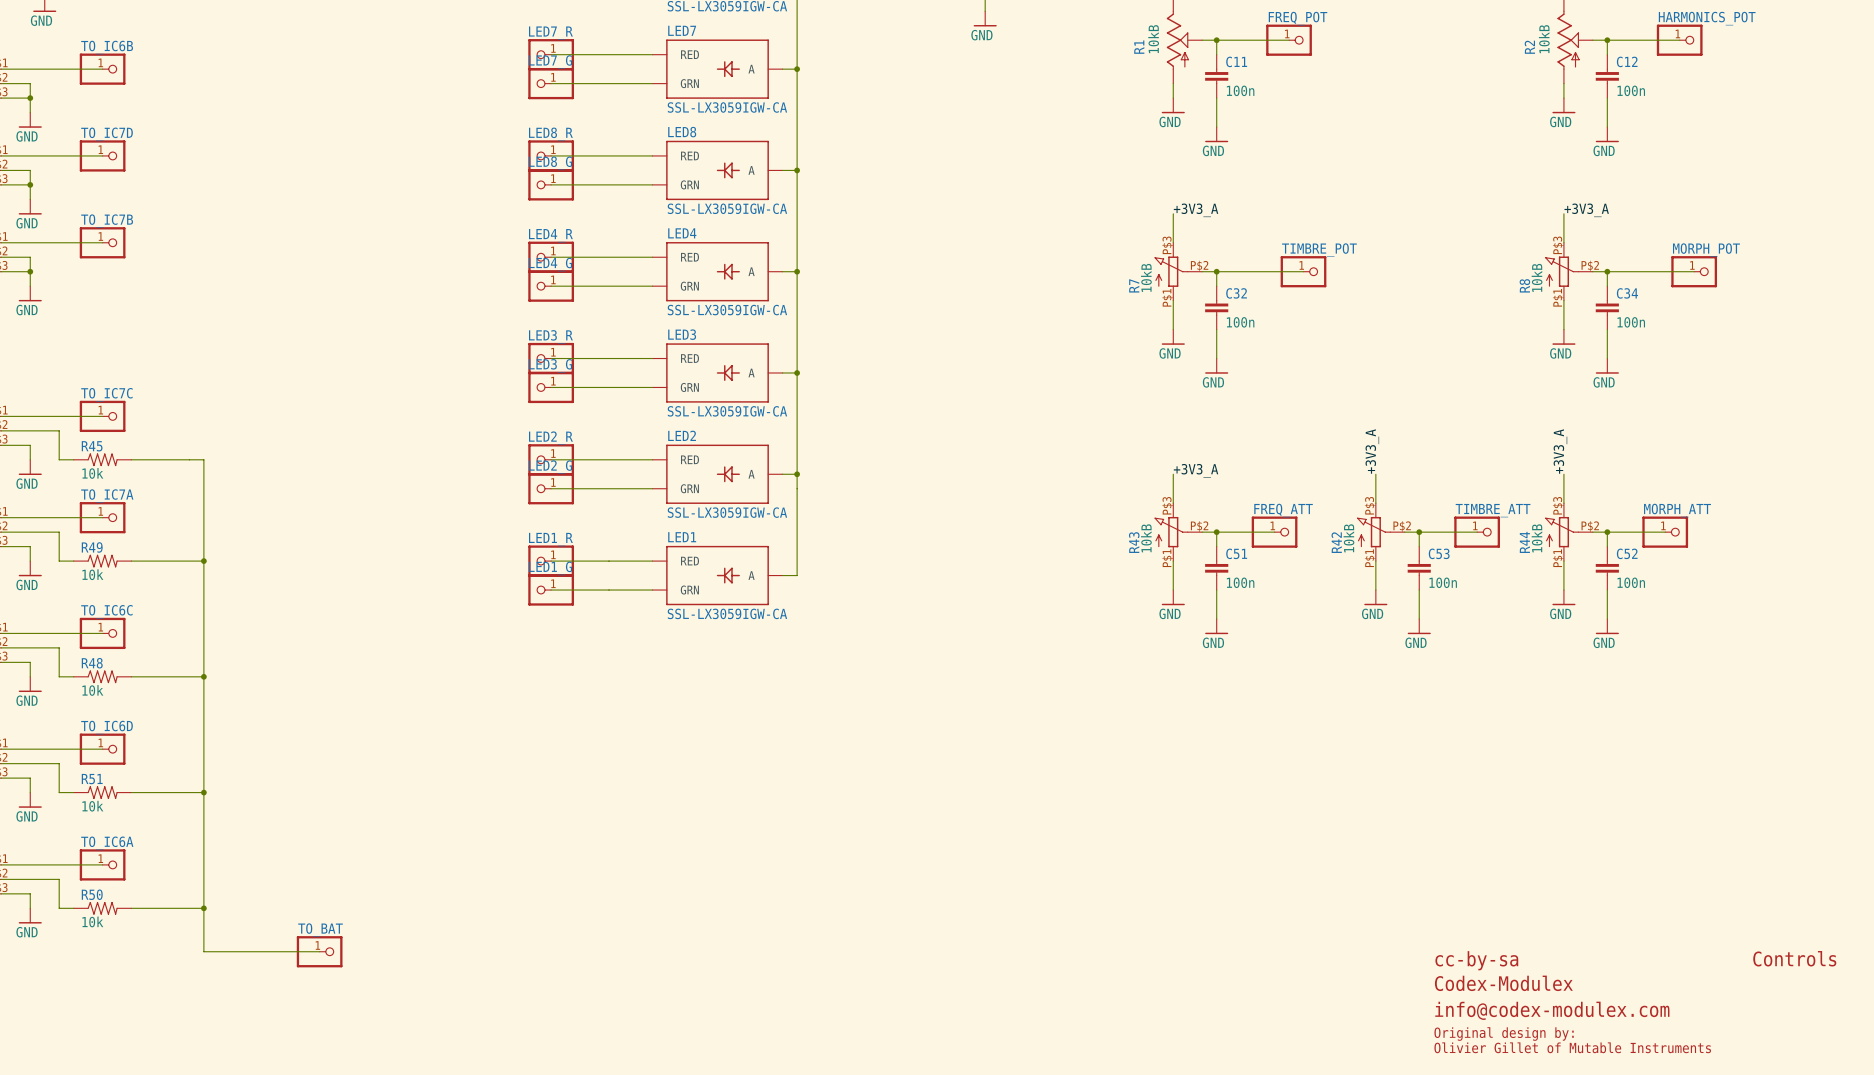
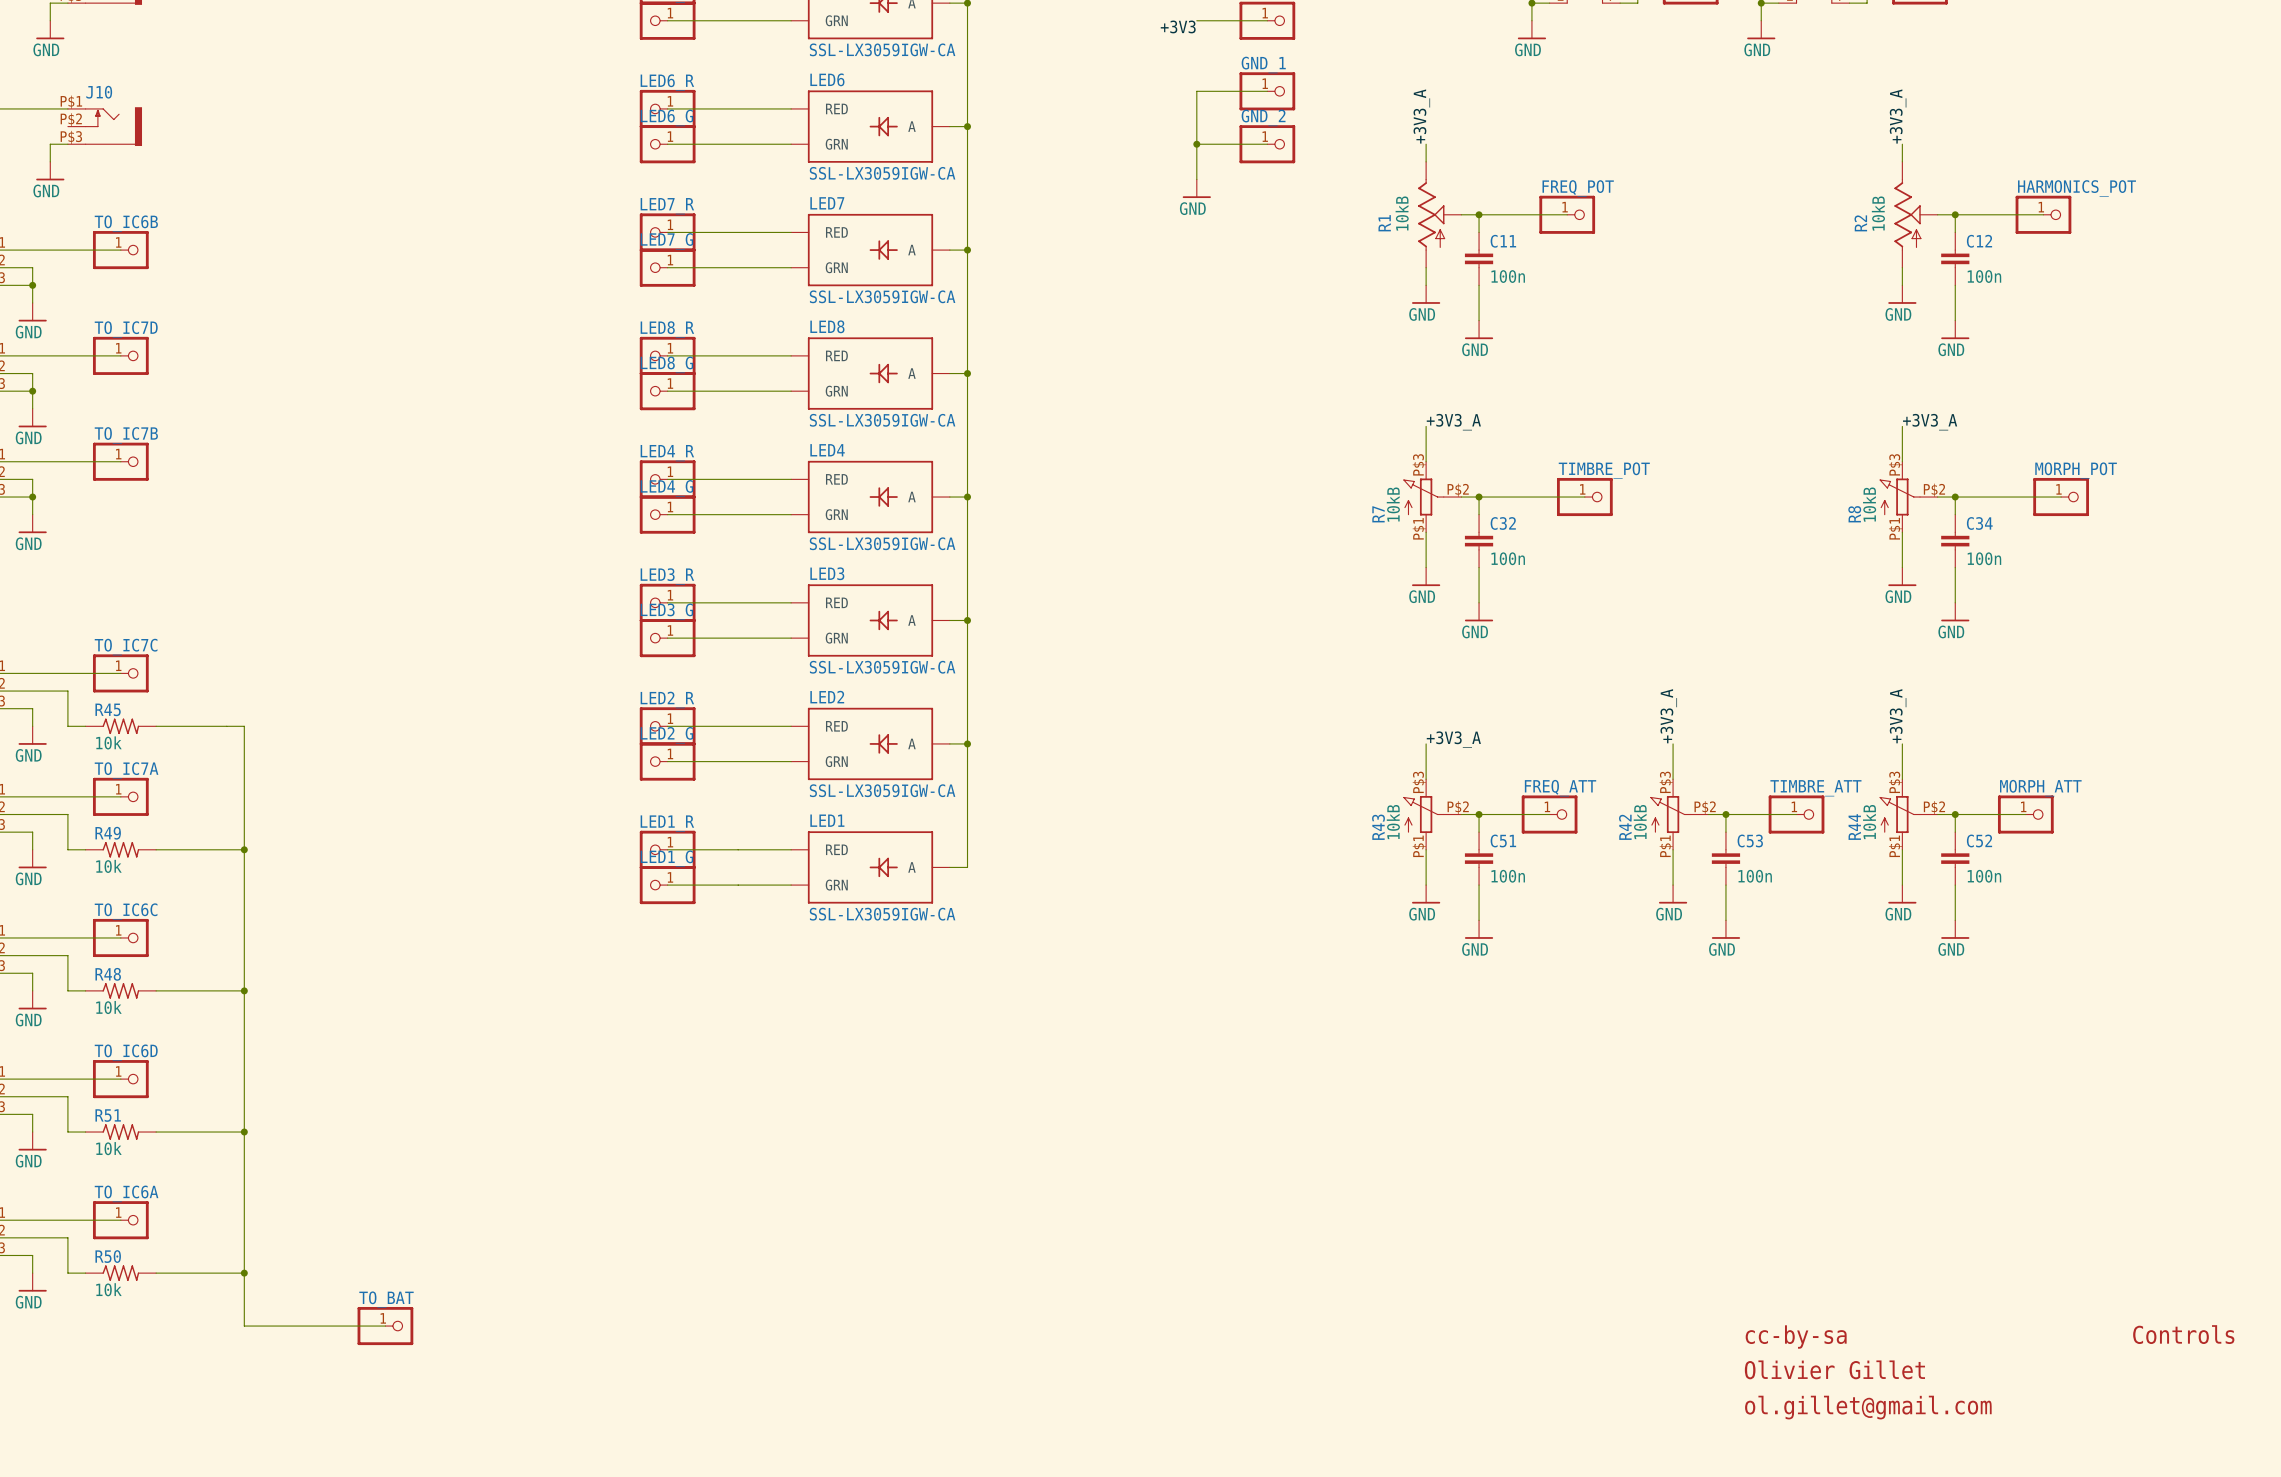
text: Codex-Modulex (1503, 983) -> Olivier Gillet (1834, 1369)
text: info@codex-modulex.com (1552, 1010) -> none
text: none -> ol.gillet@gmail.com (1868, 1407)
text: Original design by: (1504, 1034) -> none
text: Olivier Gillet of Mutable Instruments (1572, 1047) -> none

